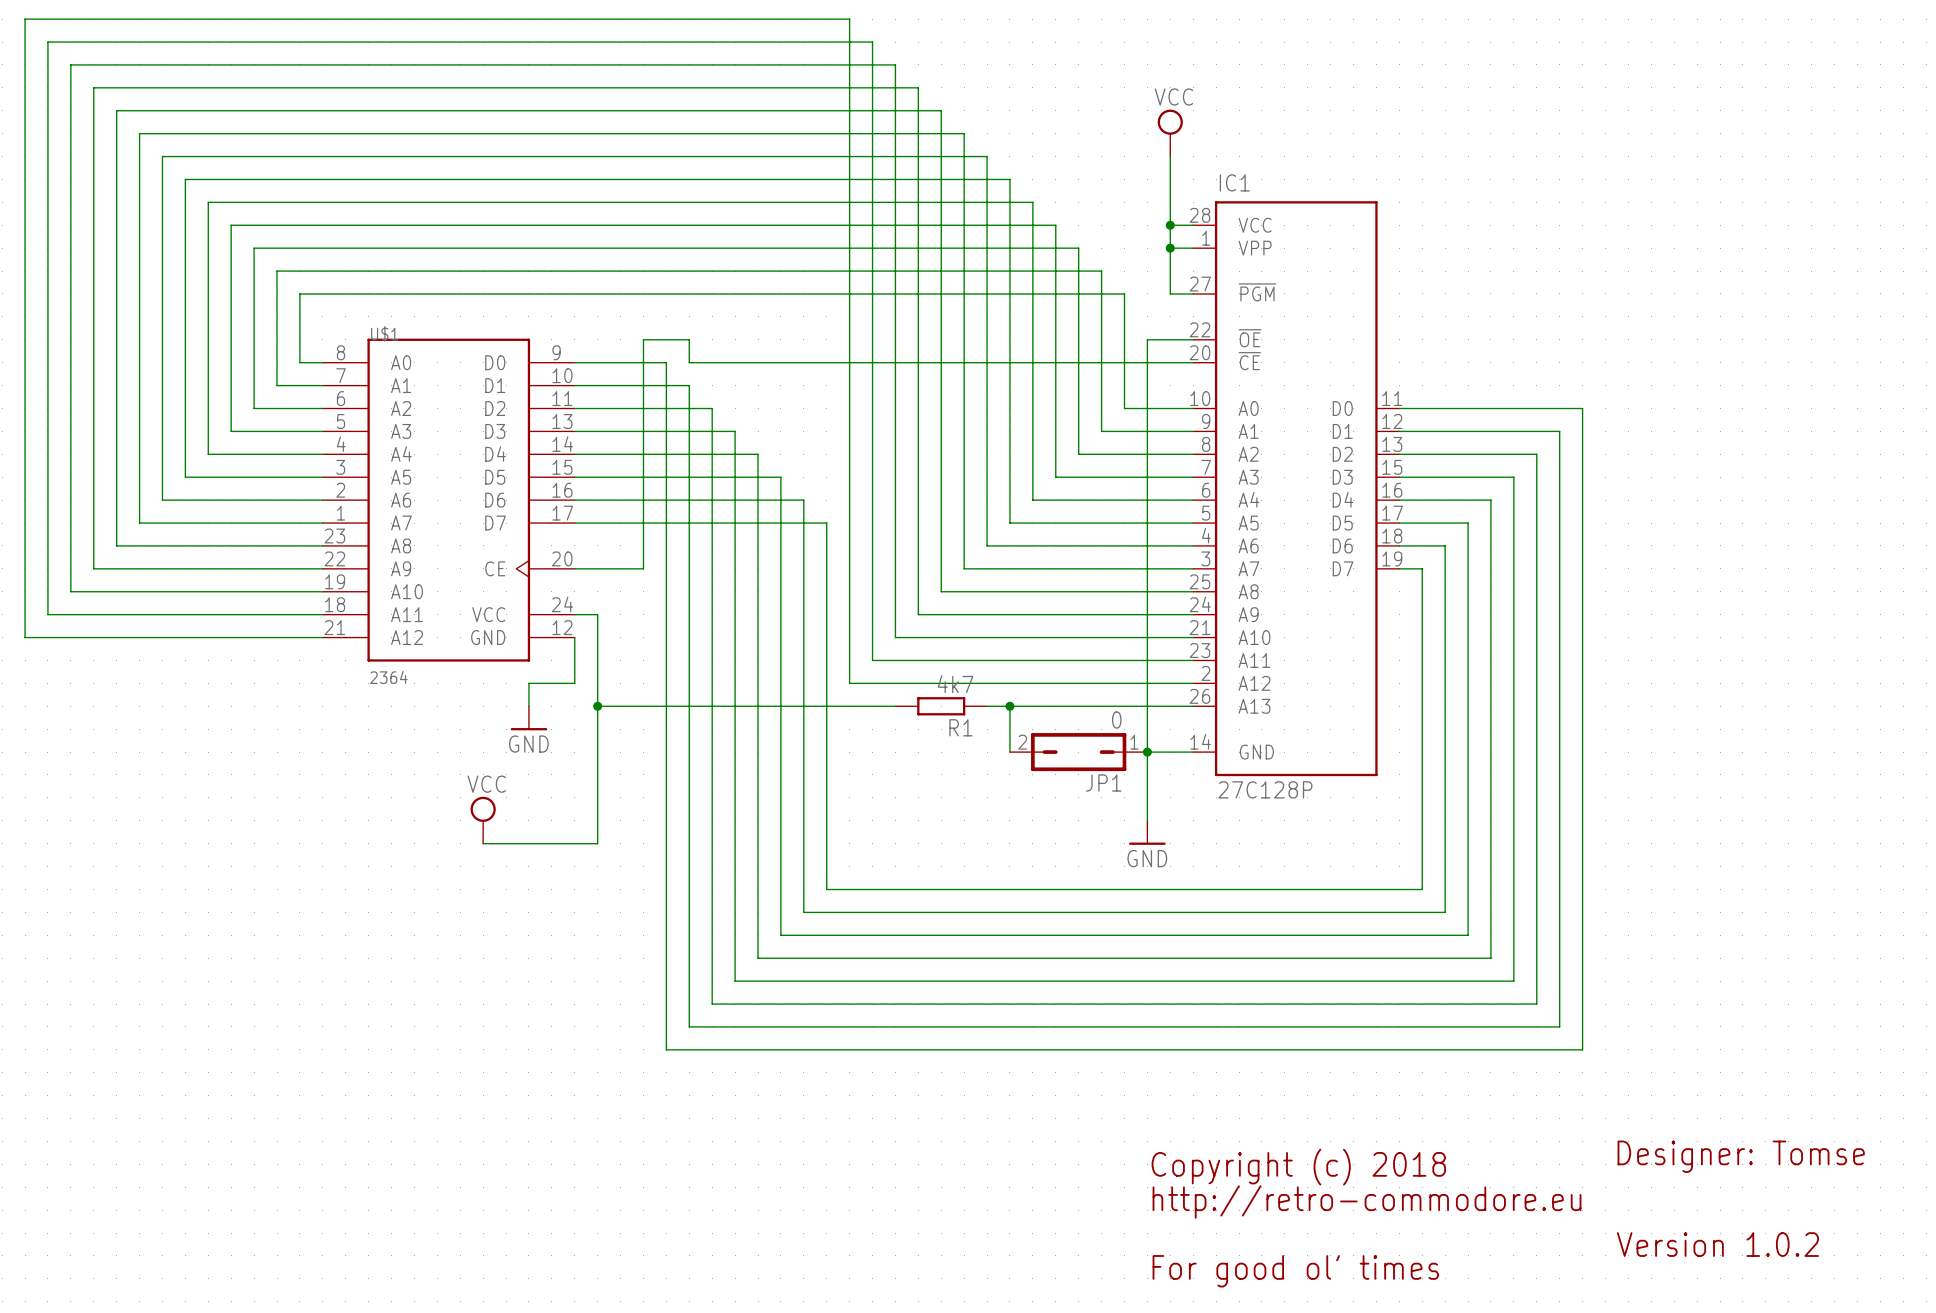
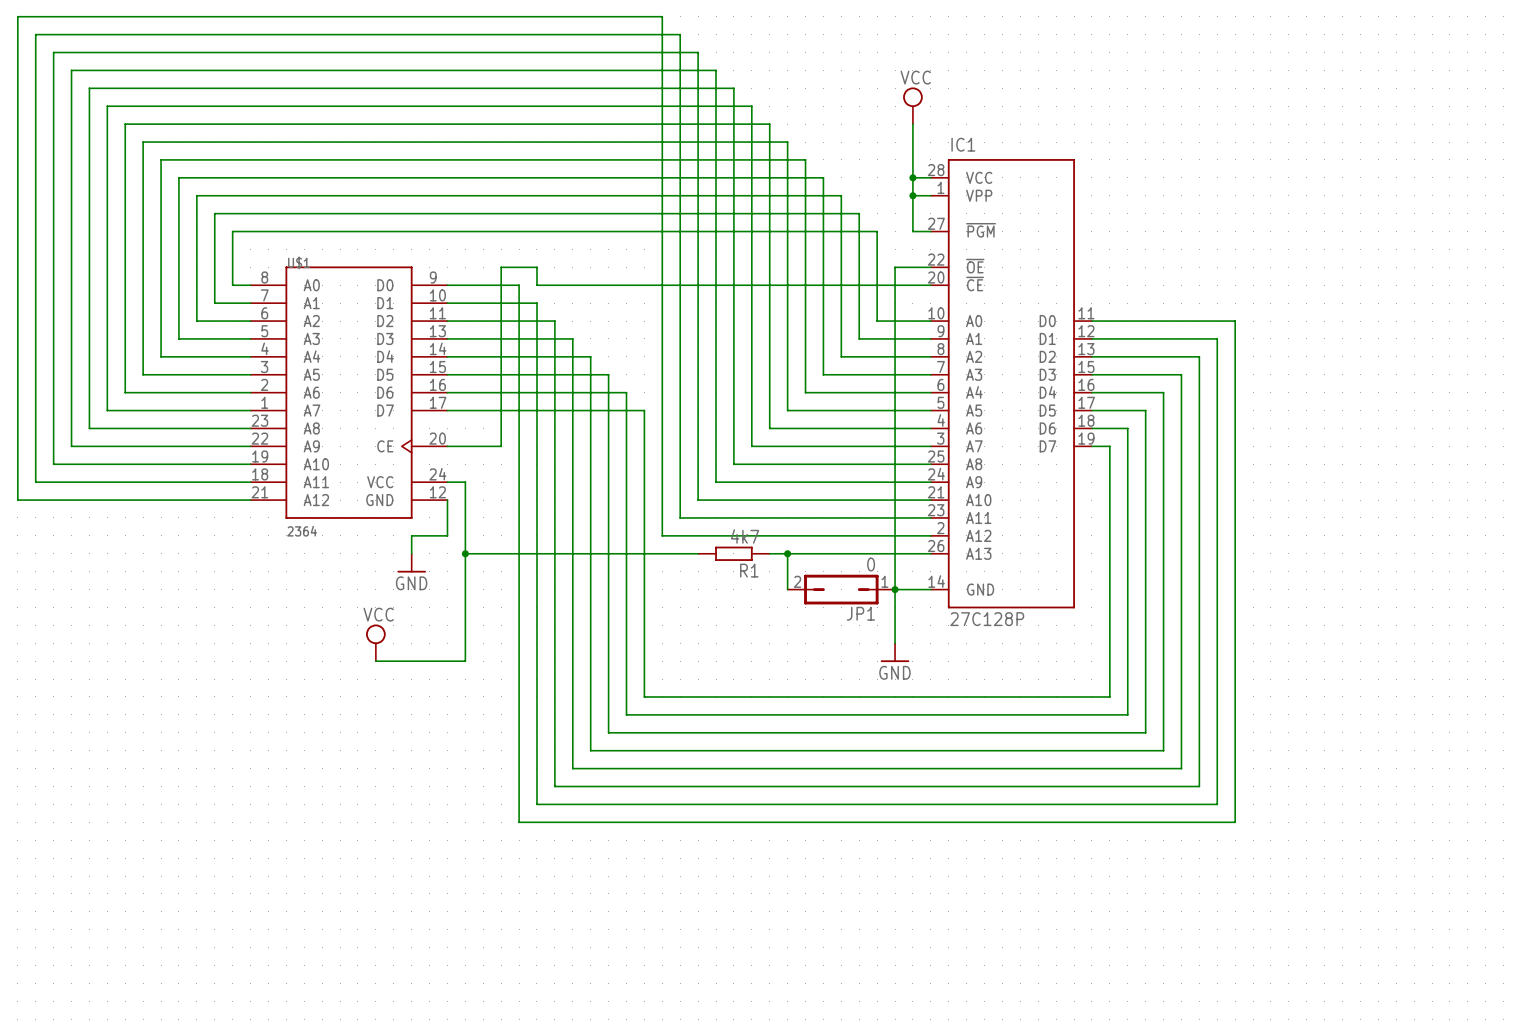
text: Designer: Tomse (1741, 1156) -> none
text: Copyright (c) 2018 (1298, 1167) -> none
text: http://retro-commodore.eu (1367, 1202) -> none
text: Version 1.0.2 (1717, 1244) -> none
text: For good ol' times (1295, 1271) -> none

